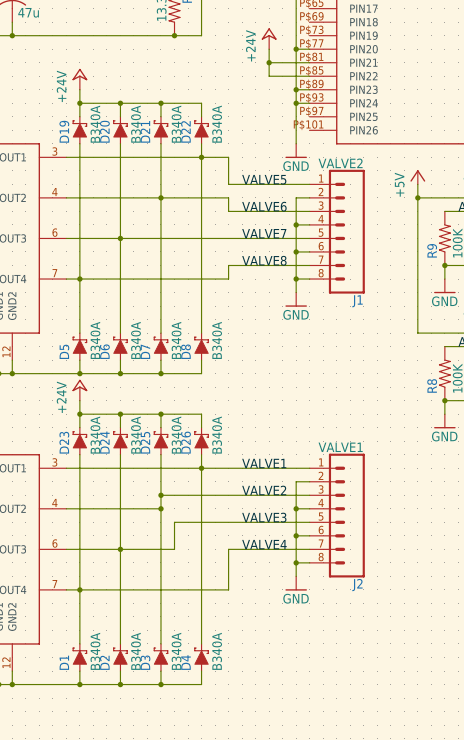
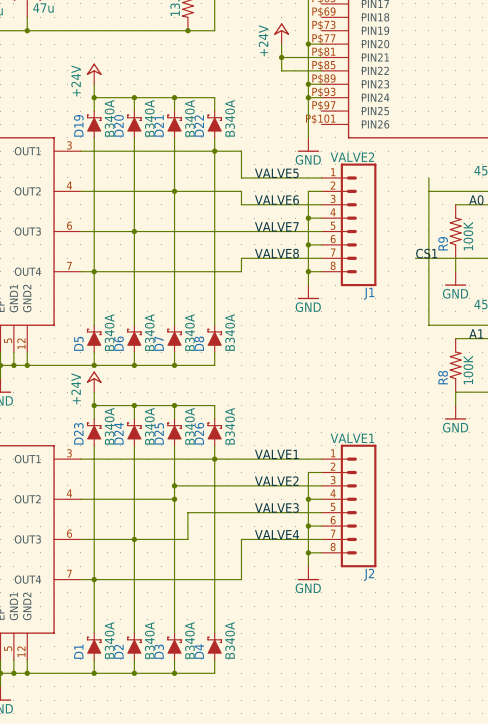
power symbol: +5V (417, 177) -> none
junction: (417, 197) -> none
label: none -> CS1 (426, 253)
wire: none -> (415, 258) (455, 258)
junction: (444, 265) -> none
junction: (444, 400) -> none

